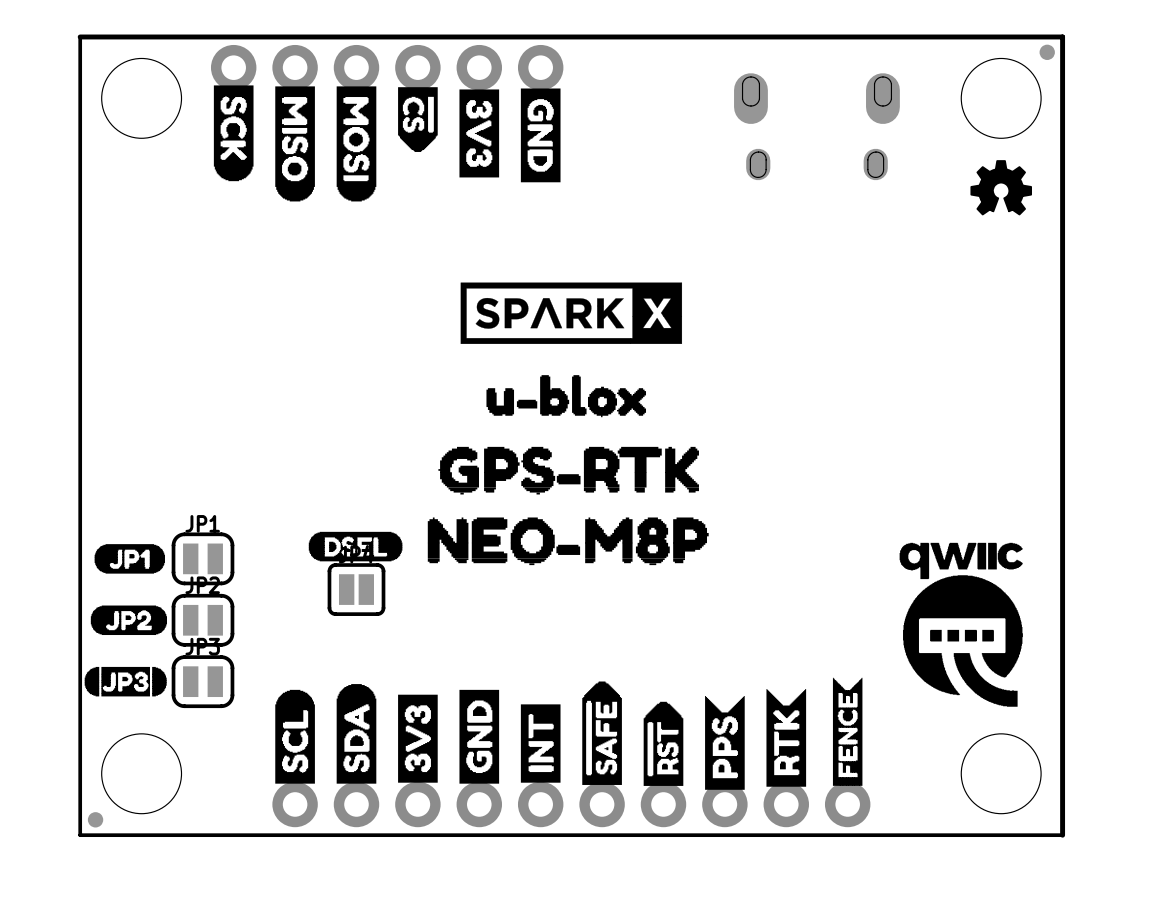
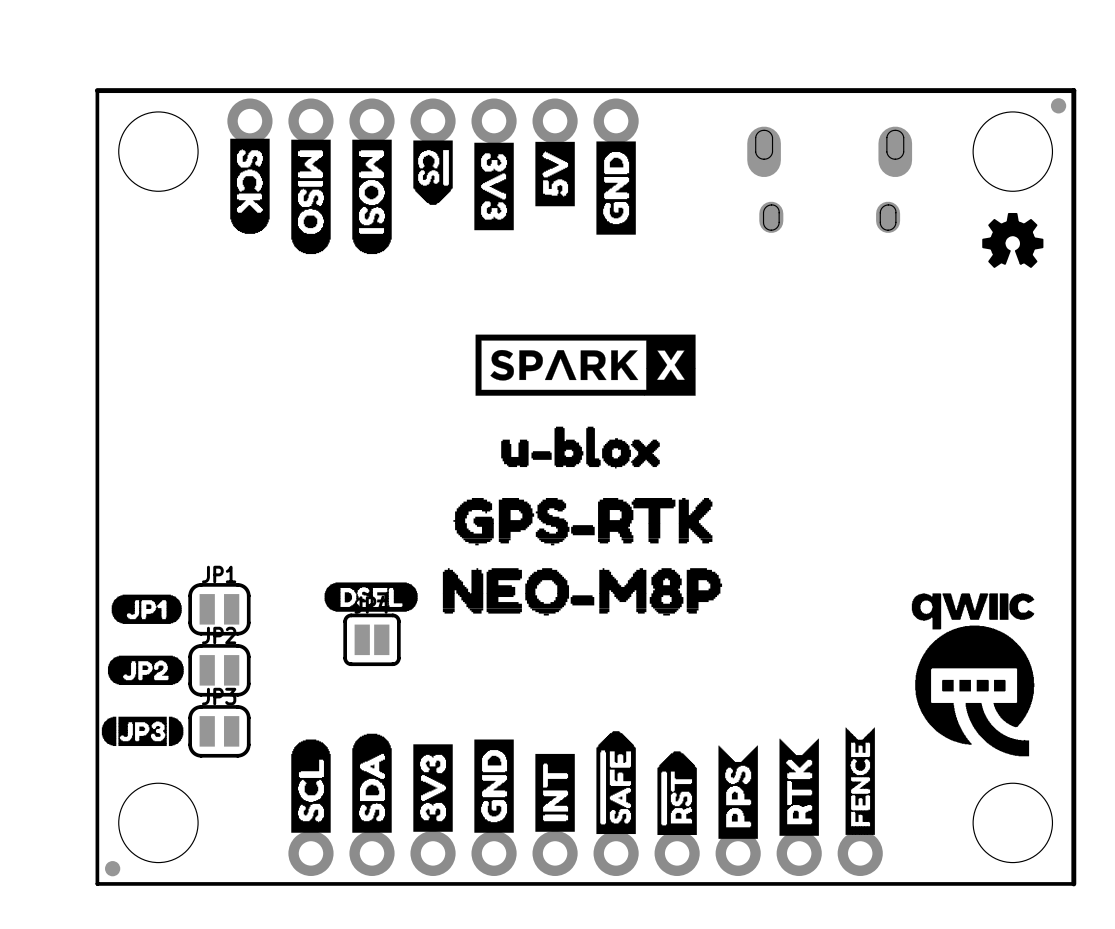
part: none -> (433, 121)
drawing shape: [520, 88, 561, 183] -> [535, 141, 575, 207]
drawing: none -> [596, 141, 636, 235]

